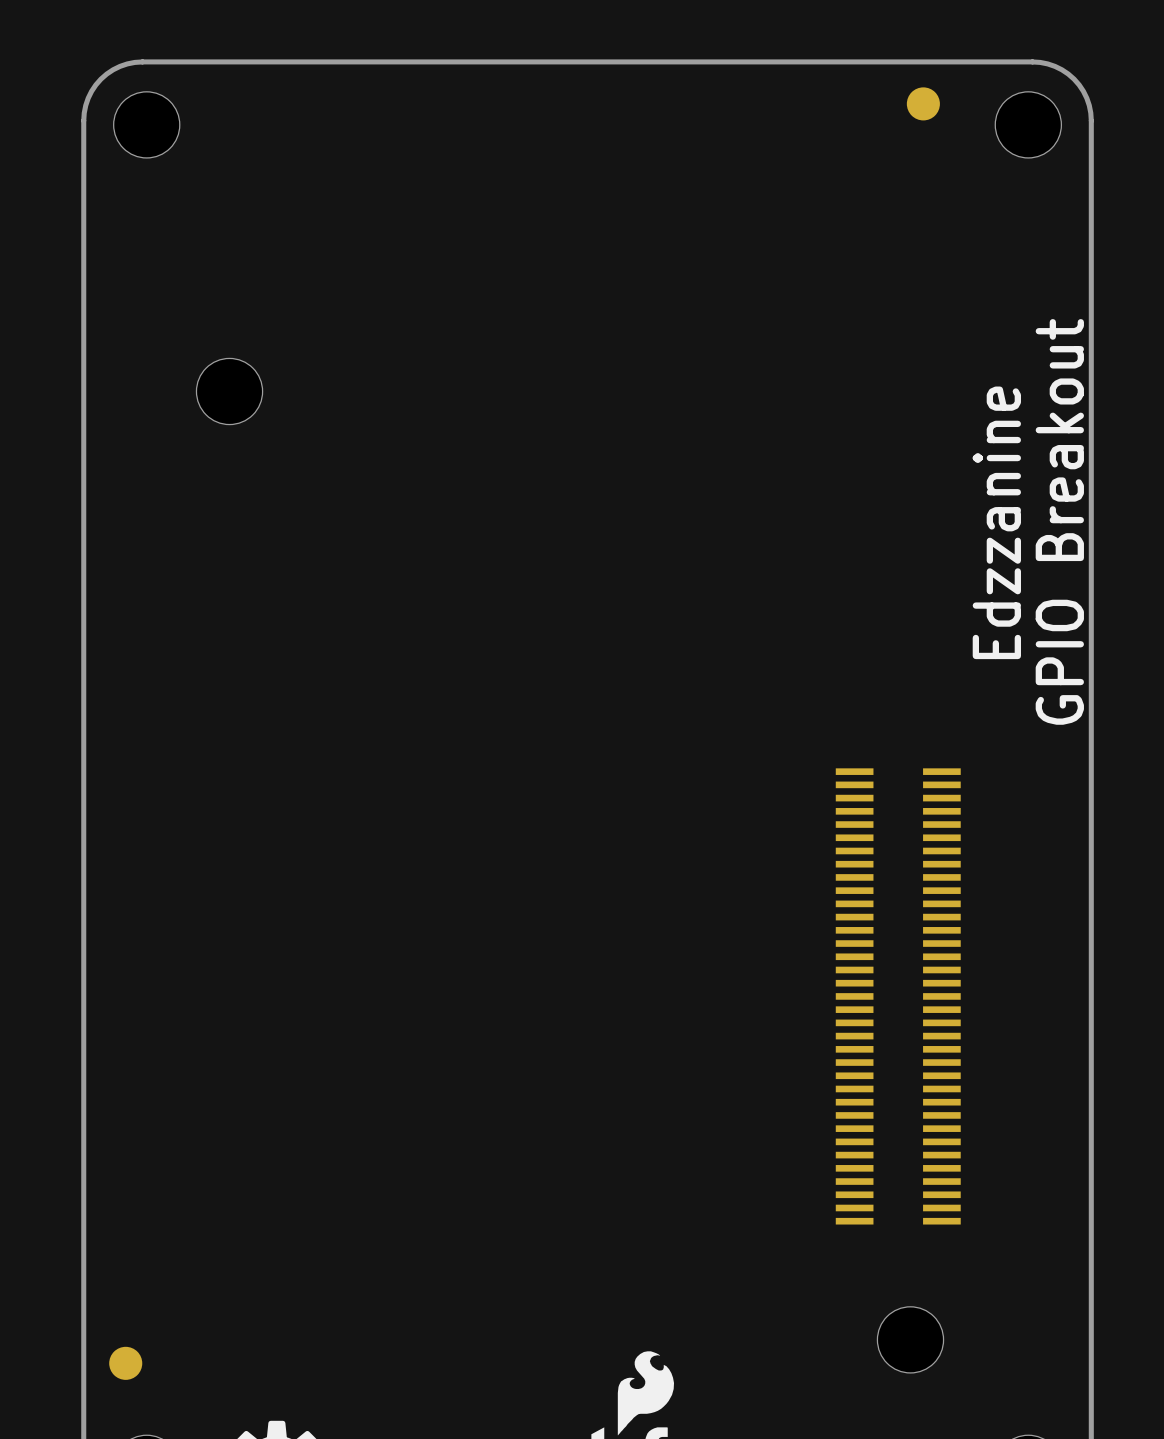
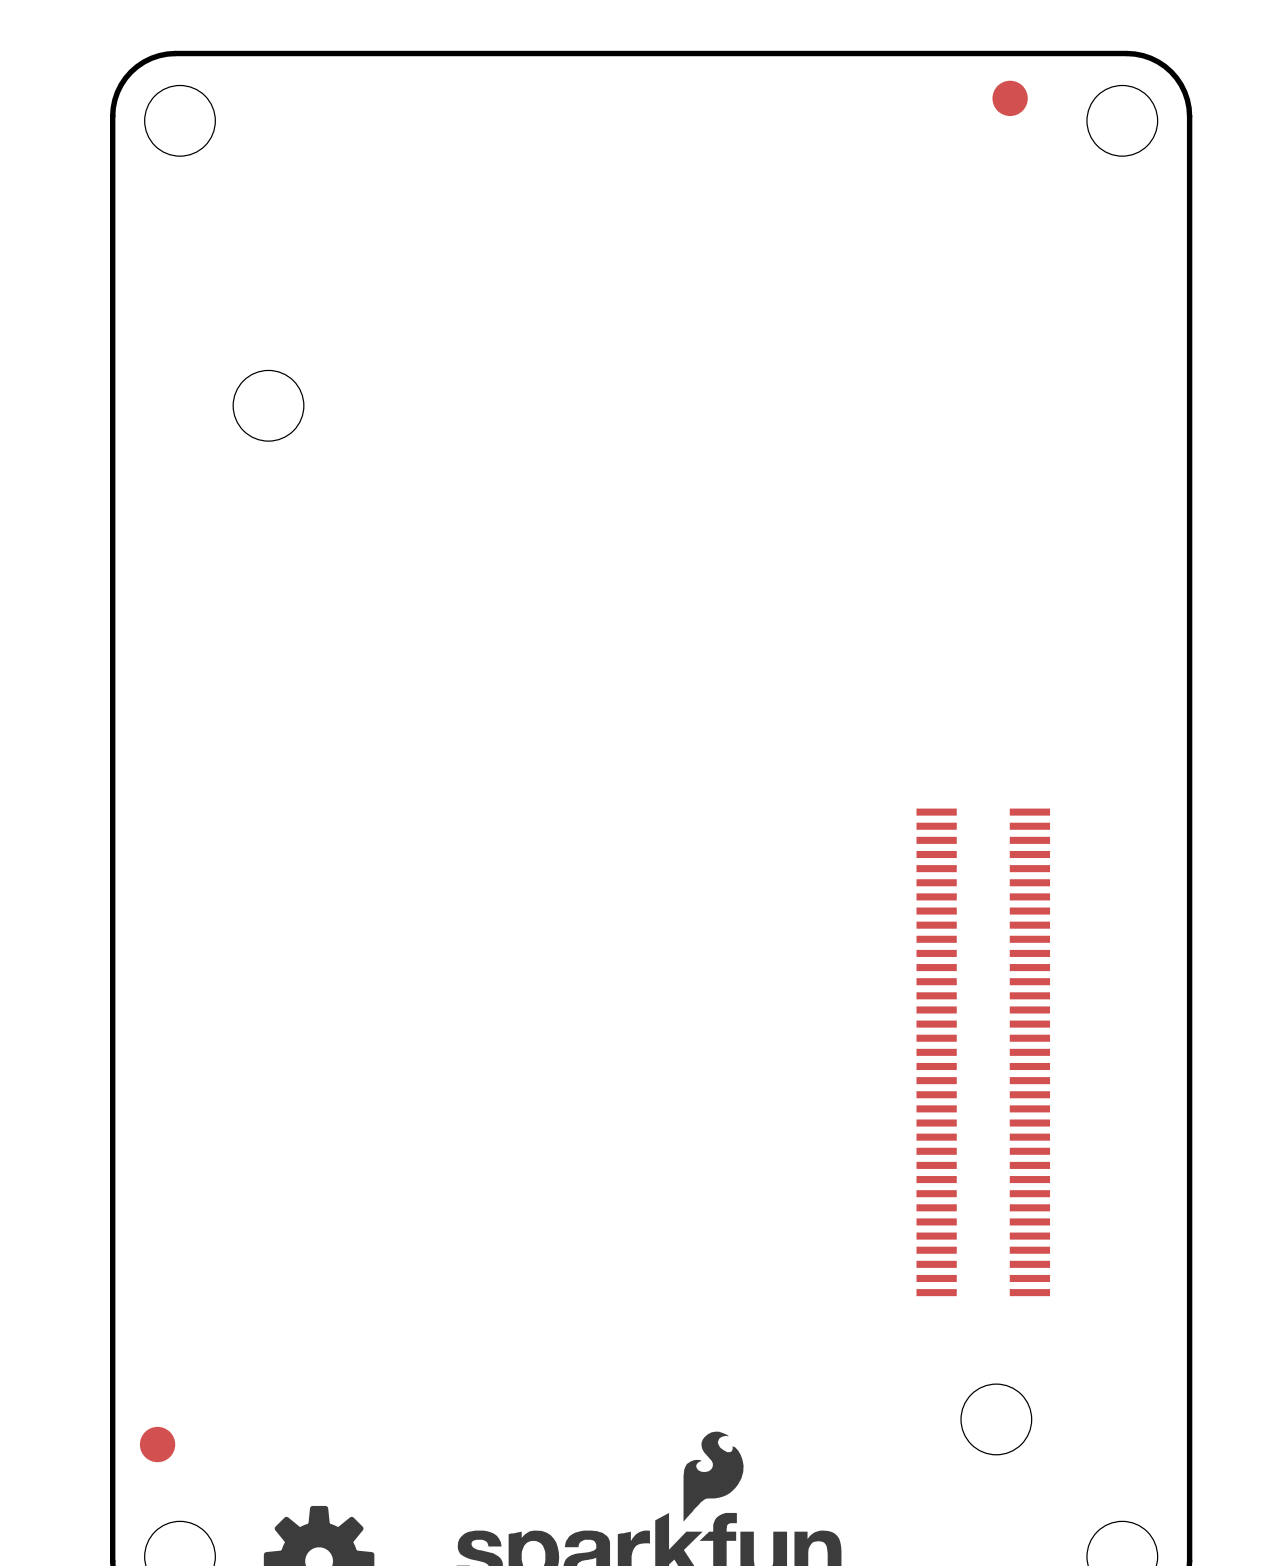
text: GPIO Breakout (1059, 521) -> none
text: Edzzanine (996, 522) -> none

